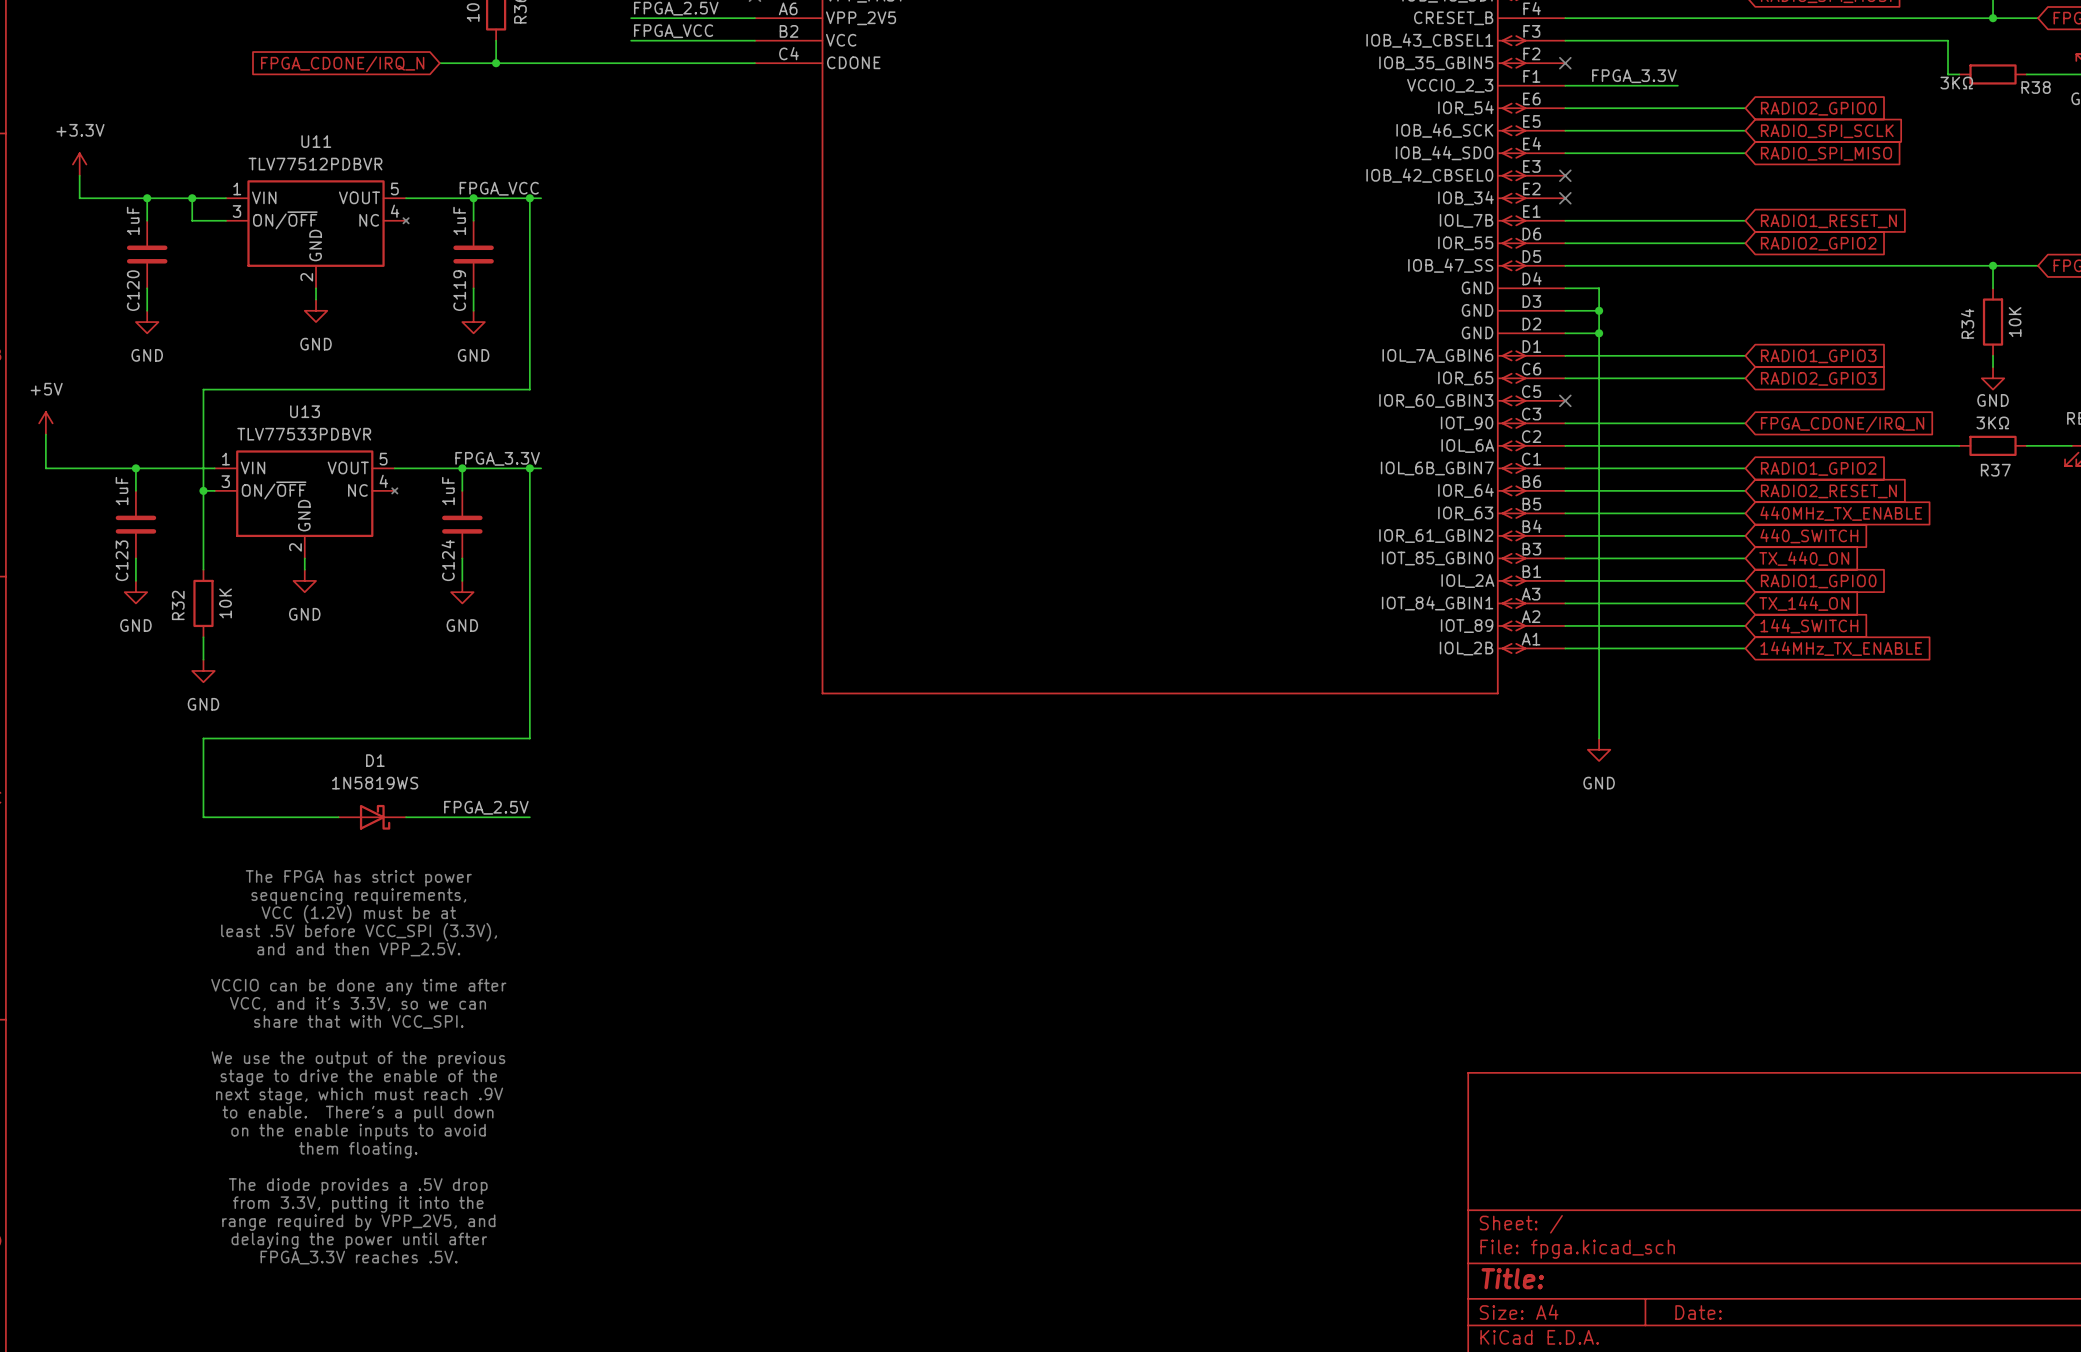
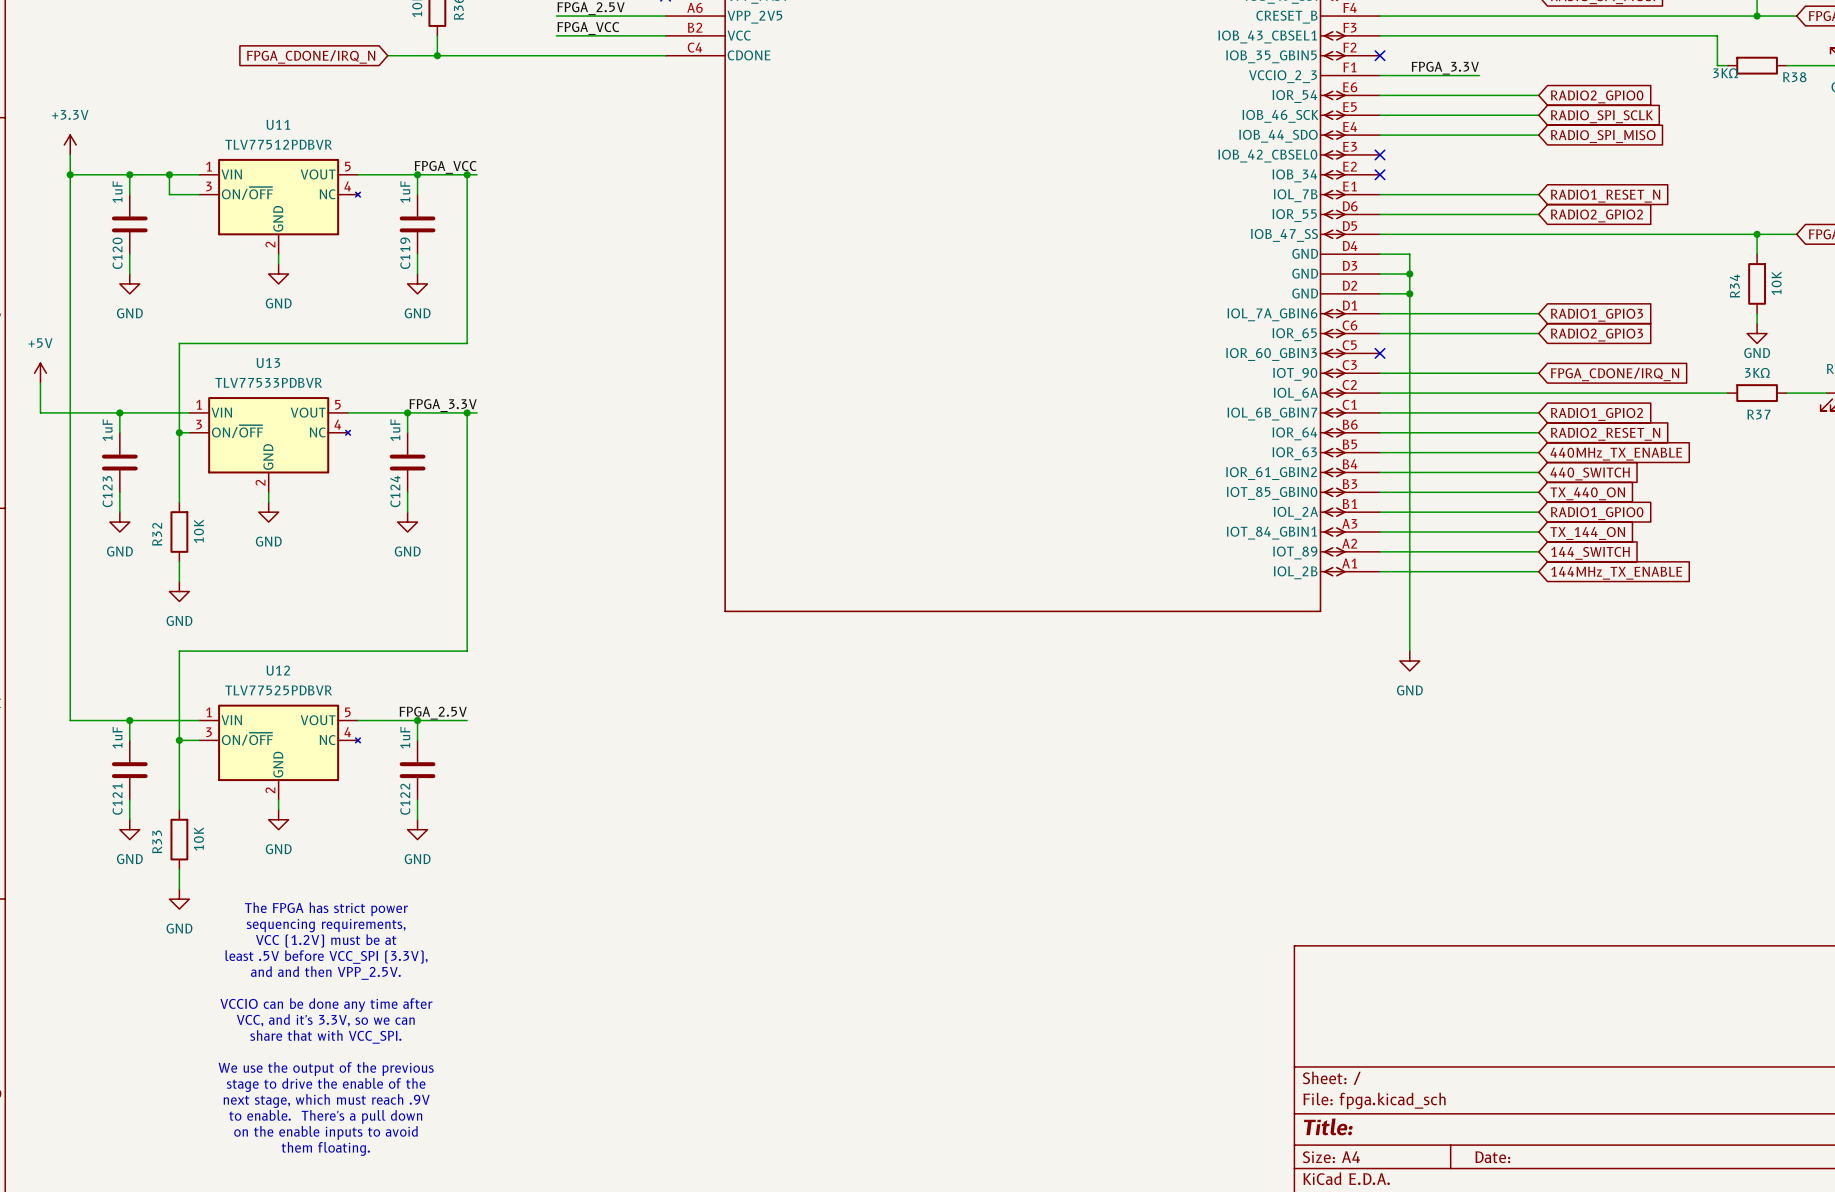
wire: none -> (70, 174) (70, 720) (179, 720) (179, 809)
junction: none -> (70, 174)
wire: none -> (129, 720) (129, 740)
junction: none -> (129, 720)
D1: 1N5819WS (372, 817) -> none
wire: none -> (417, 720) (417, 740)
junction: none -> (417, 720)
wire: none -> (179, 740) (199, 740)
junction: none -> (179, 740)
U12: none -> TLV77525PDBVR (279, 752)
C121: none -> 1uF (129, 770)
C122: none -> 1uF (417, 770)
text position: The FPGA has strict power (358, 878) -> The FPGA has strict power (326, 909)
text position: sequencing requirements, (358, 896) -> sequencing requirements, (326, 925)
wire: none -> (129, 799) (129, 819)
wire: none -> (278, 799) (278, 809)
wire: none -> (417, 799) (417, 819)
text position: VCC (1.2V) must be at (358, 914) -> VCC (1.2V) must be at (326, 940)
power symbol: none -> GND (278, 819)
text position: least .5V before VCC_SPI (3.3V), (359, 932) -> least .5V before VCC_SPI (3.3V), (326, 957)
power symbol: none -> GND (129, 829)
power symbol: none -> GND (417, 829)
text position: and and then VPP_2.5V. (358, 949) -> and and then VPP_2.5V. (325, 973)
R33: none -> 10K (179, 839)
wire: none -> (179, 869) (179, 889)
text position: VCCIO can be done any time after (358, 987) -> VCCIO can be done any time after (326, 1005)
text position: VCC, and it's 3.3V, so we can (357, 1004) -> VCC, and it's 3.3V, so we can (325, 1020)
power symbol: none -> GND (179, 899)
text position: share that with VCC_SPI. (358, 1021) -> share that with VCC_SPI. (325, 1036)
text position: We use the output of the previous (358, 1059) -> We use the output of the previous (326, 1069)
text position: stage to drive the enable of the (358, 1077) -> stage to drive the enable of the (326, 1085)
text position: next stage, which must reach .9V (359, 1095) -> next stage, which must reach .9V (326, 1101)
text position: to enable. There's a pull down (357, 1113) -> to enable. There's a pull down (325, 1116)
text position: on the enable inputs to avoid (358, 1132) -> on the enable inputs to avoid (325, 1132)
text position: them floating. (358, 1150) -> them floating. (325, 1148)
text: The diode provides a .5V drop (358, 1186) -> none
text: from 3.3V, putting it into the (358, 1204) -> none
text: range required by VPP_2V5, and (358, 1222) -> none
text: delaying the power until after (359, 1240) -> none
text: FPGA_3.3V reaches .5V. (359, 1257) -> none

